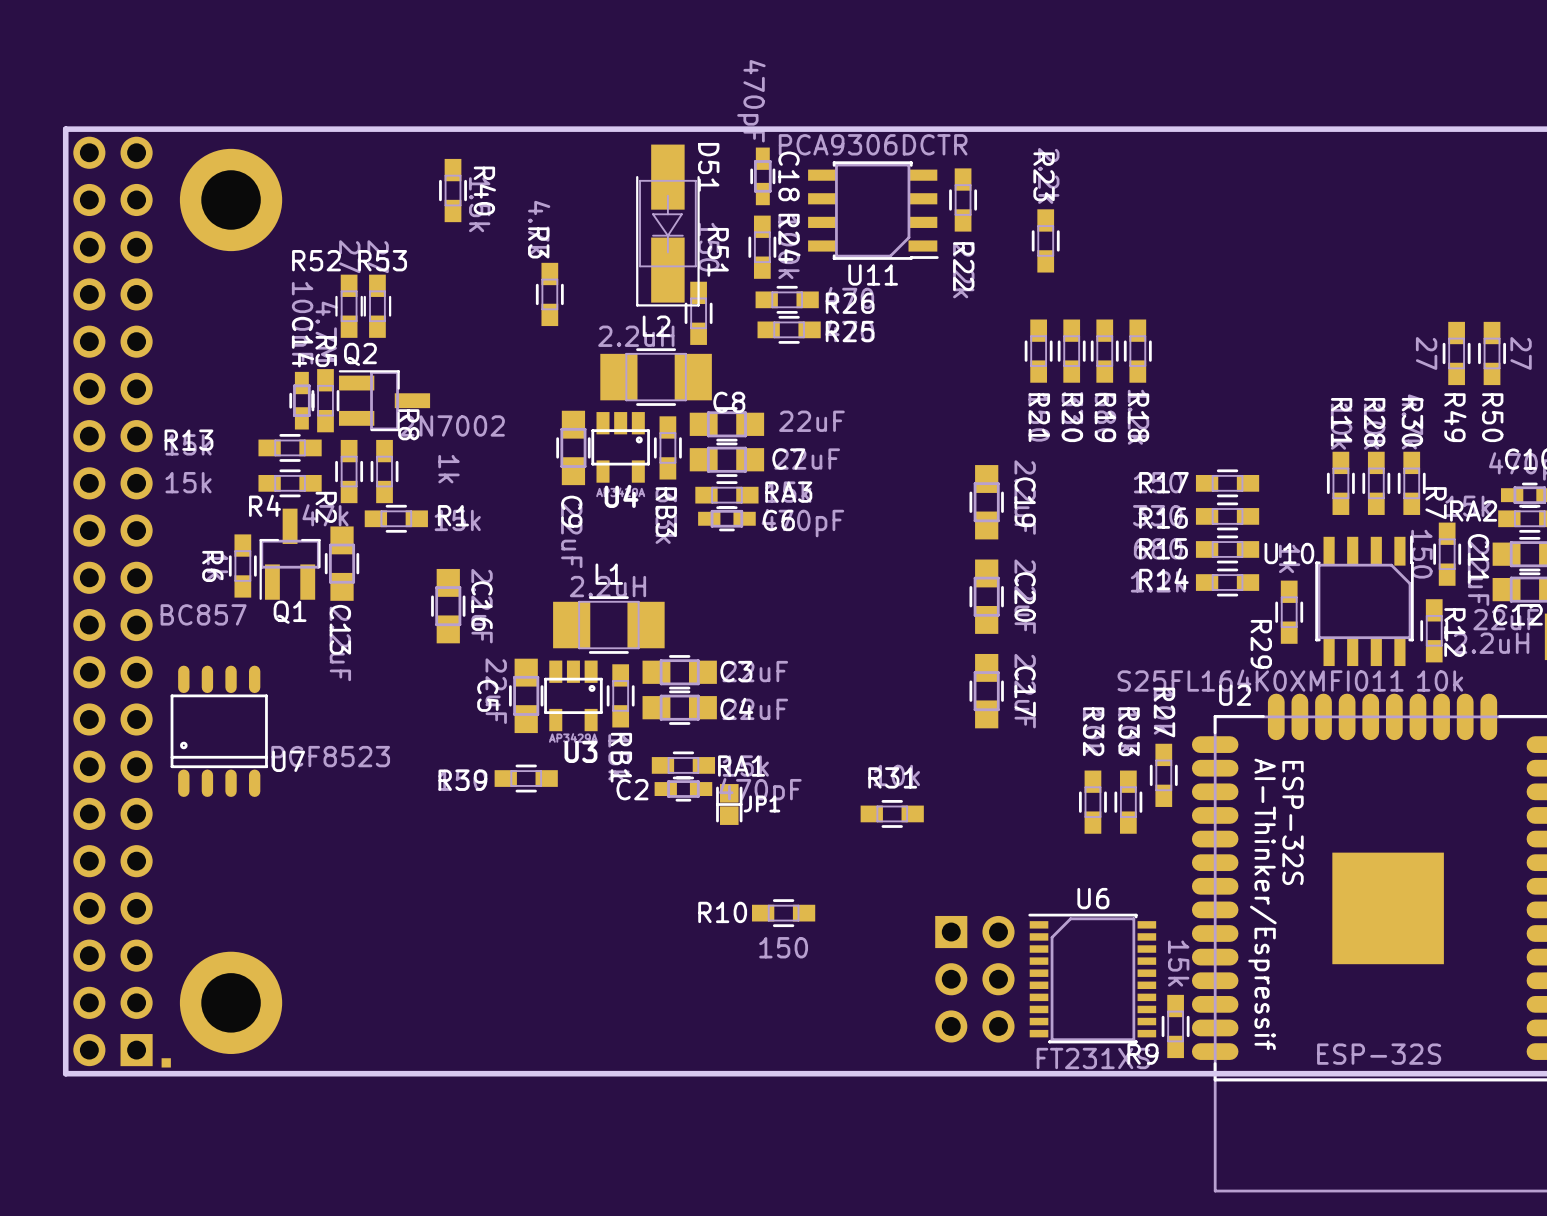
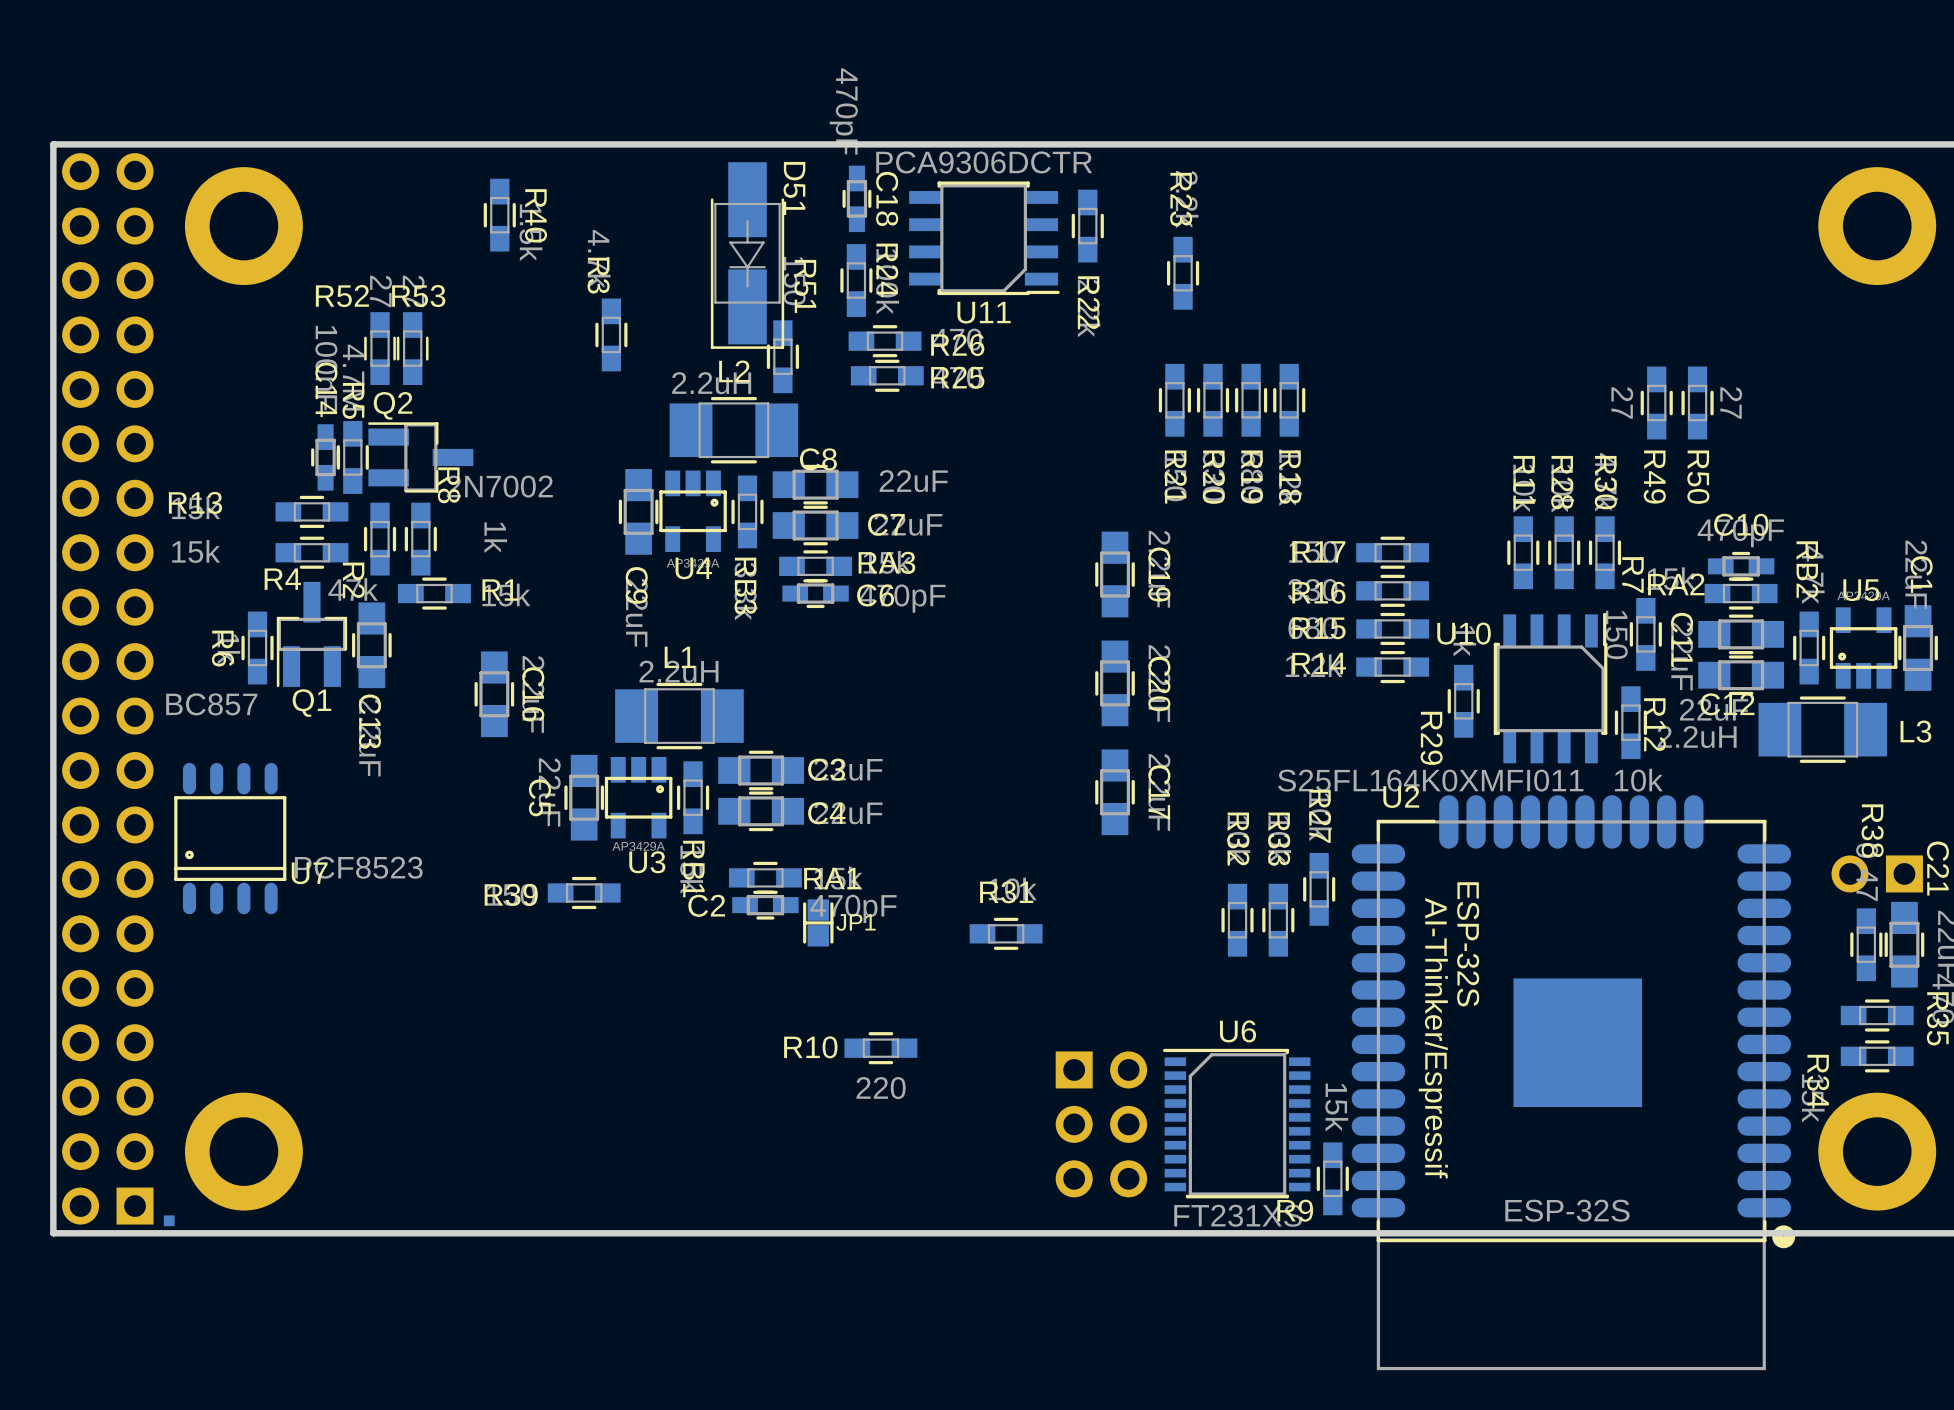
R10 value: 150 (783, 947) -> 220 (881, 1088)

